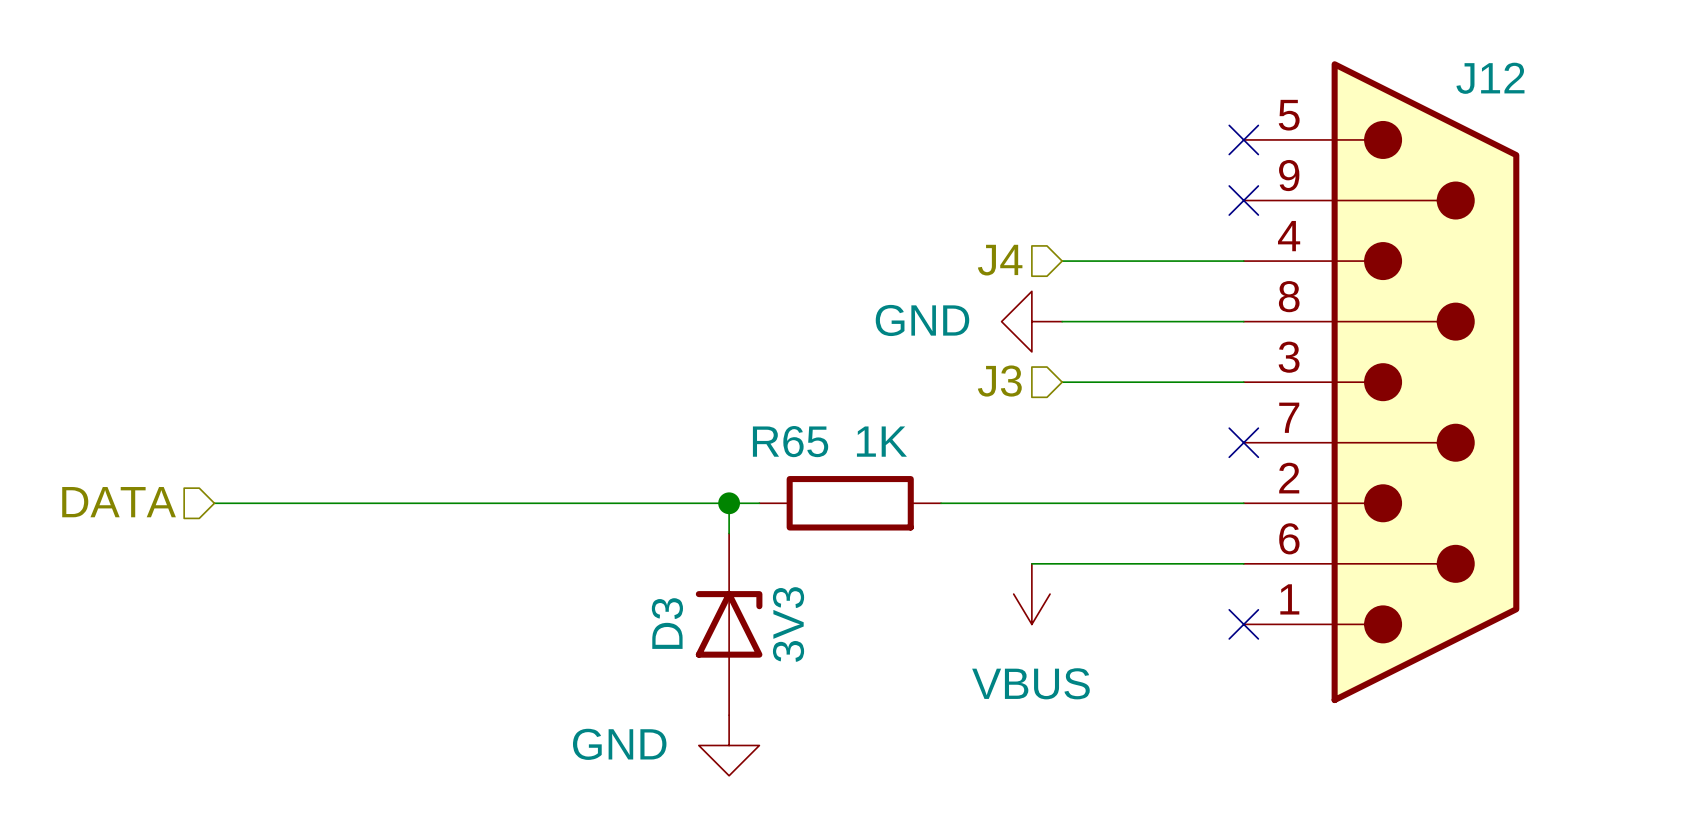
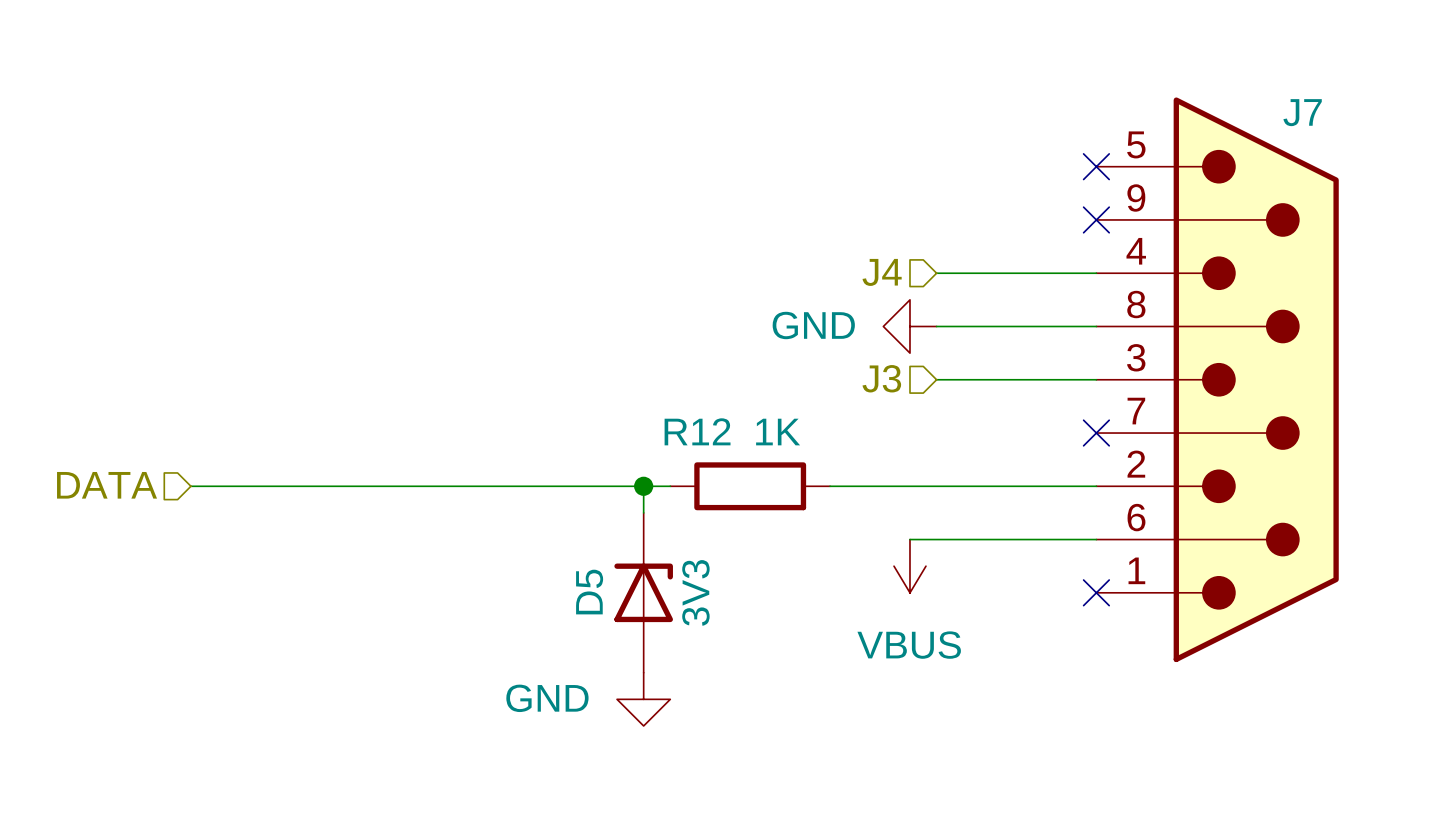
J12 name: J12 (1490, 78) -> J7 (1302, 112)
R65 name: R65 (790, 441) -> R12 (697, 431)
D3 name: D3 (667, 623) -> D5 (589, 592)

